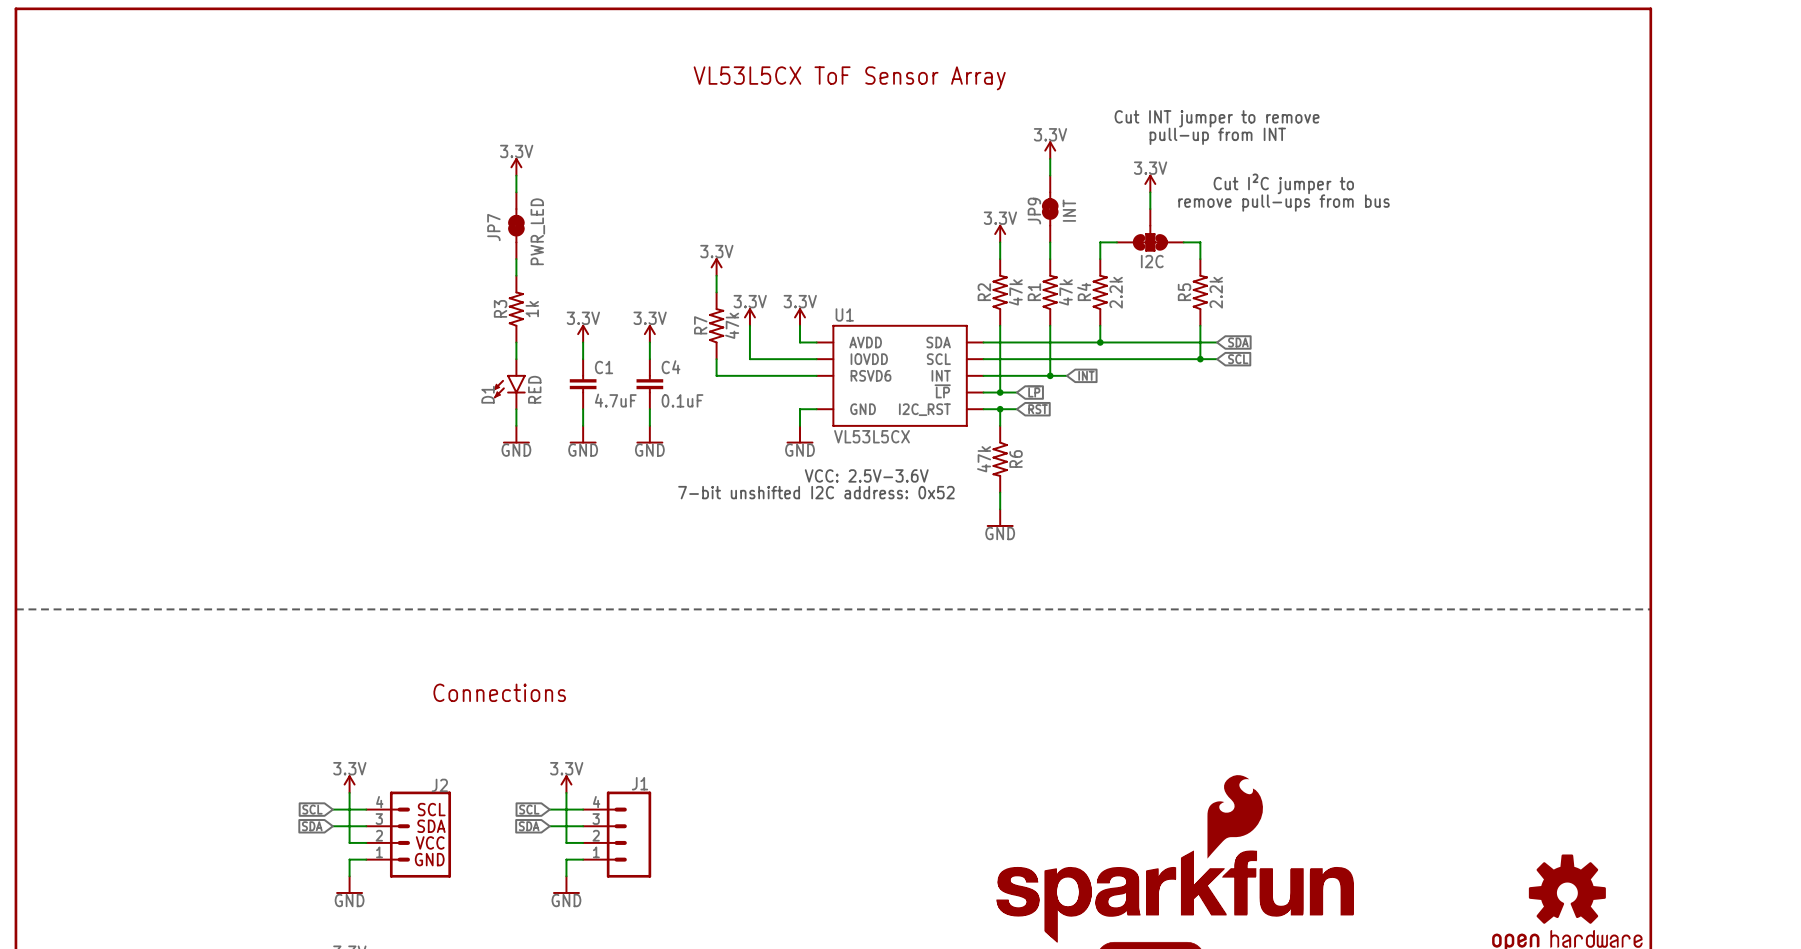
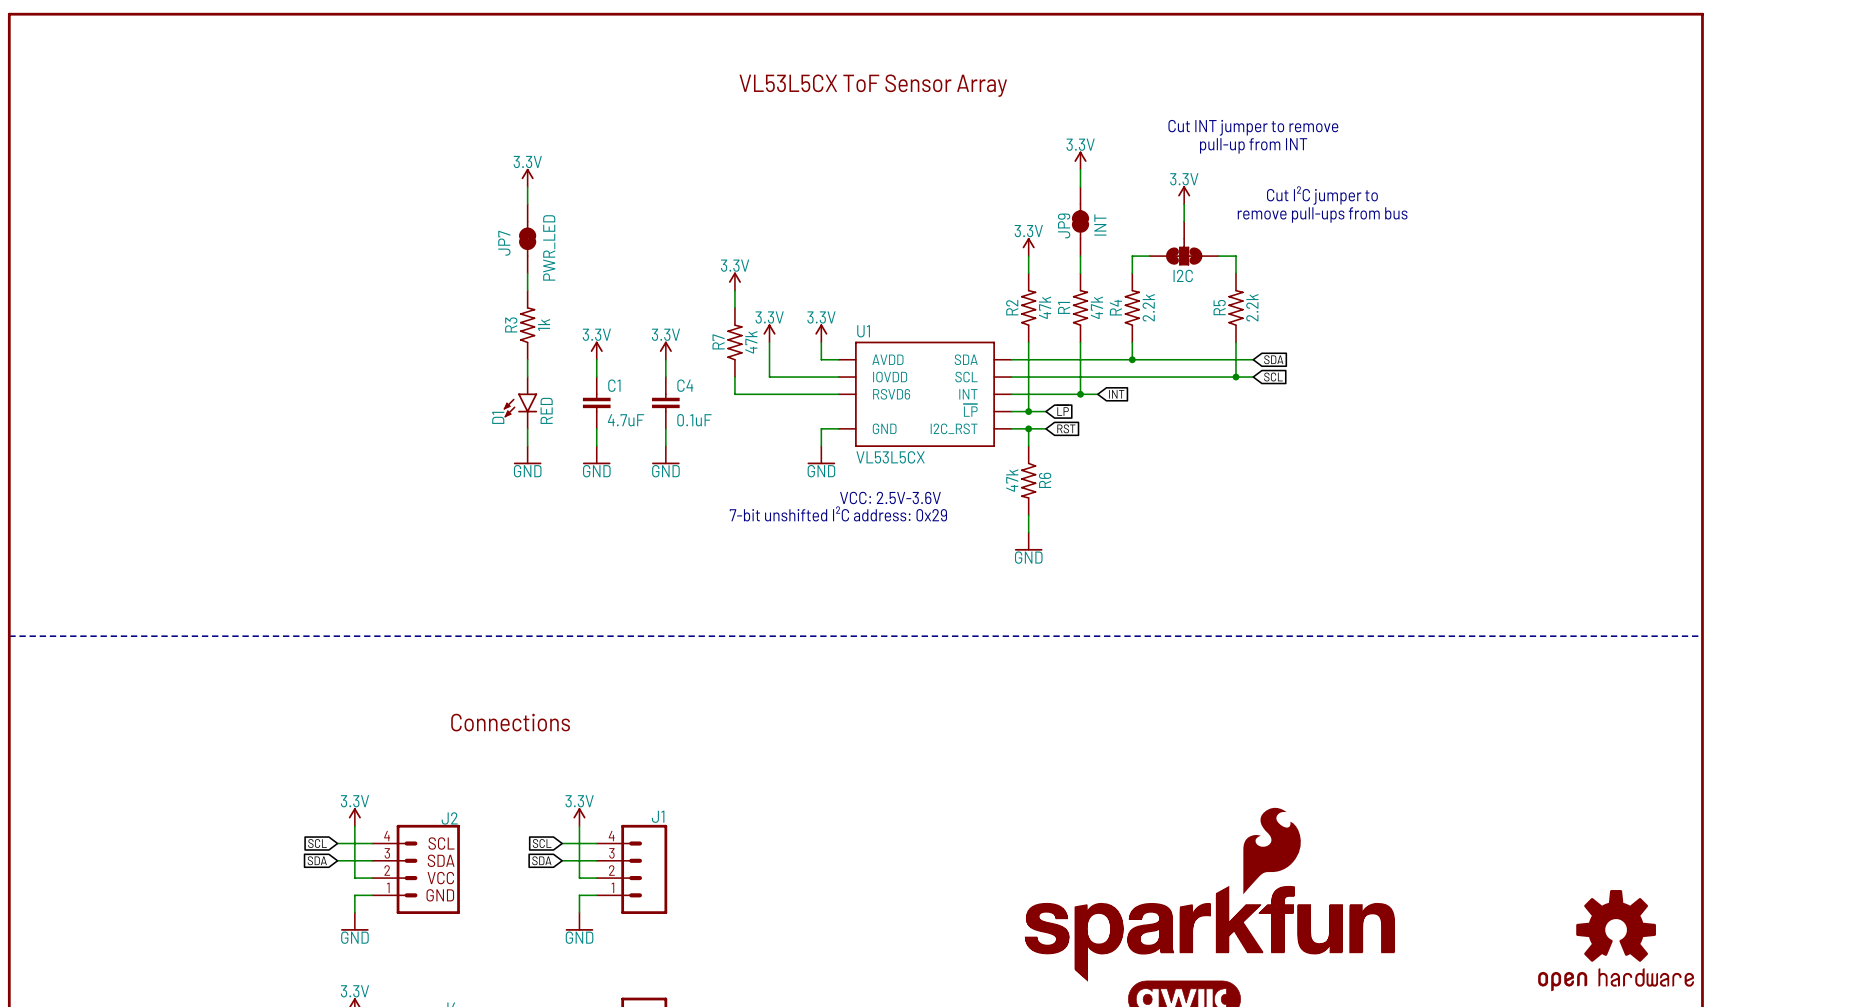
text: 7-bit unshifted I2C address: 0x52 (816, 492) -> 7-bit unshifted I²C address: 0x29 (838, 513)

